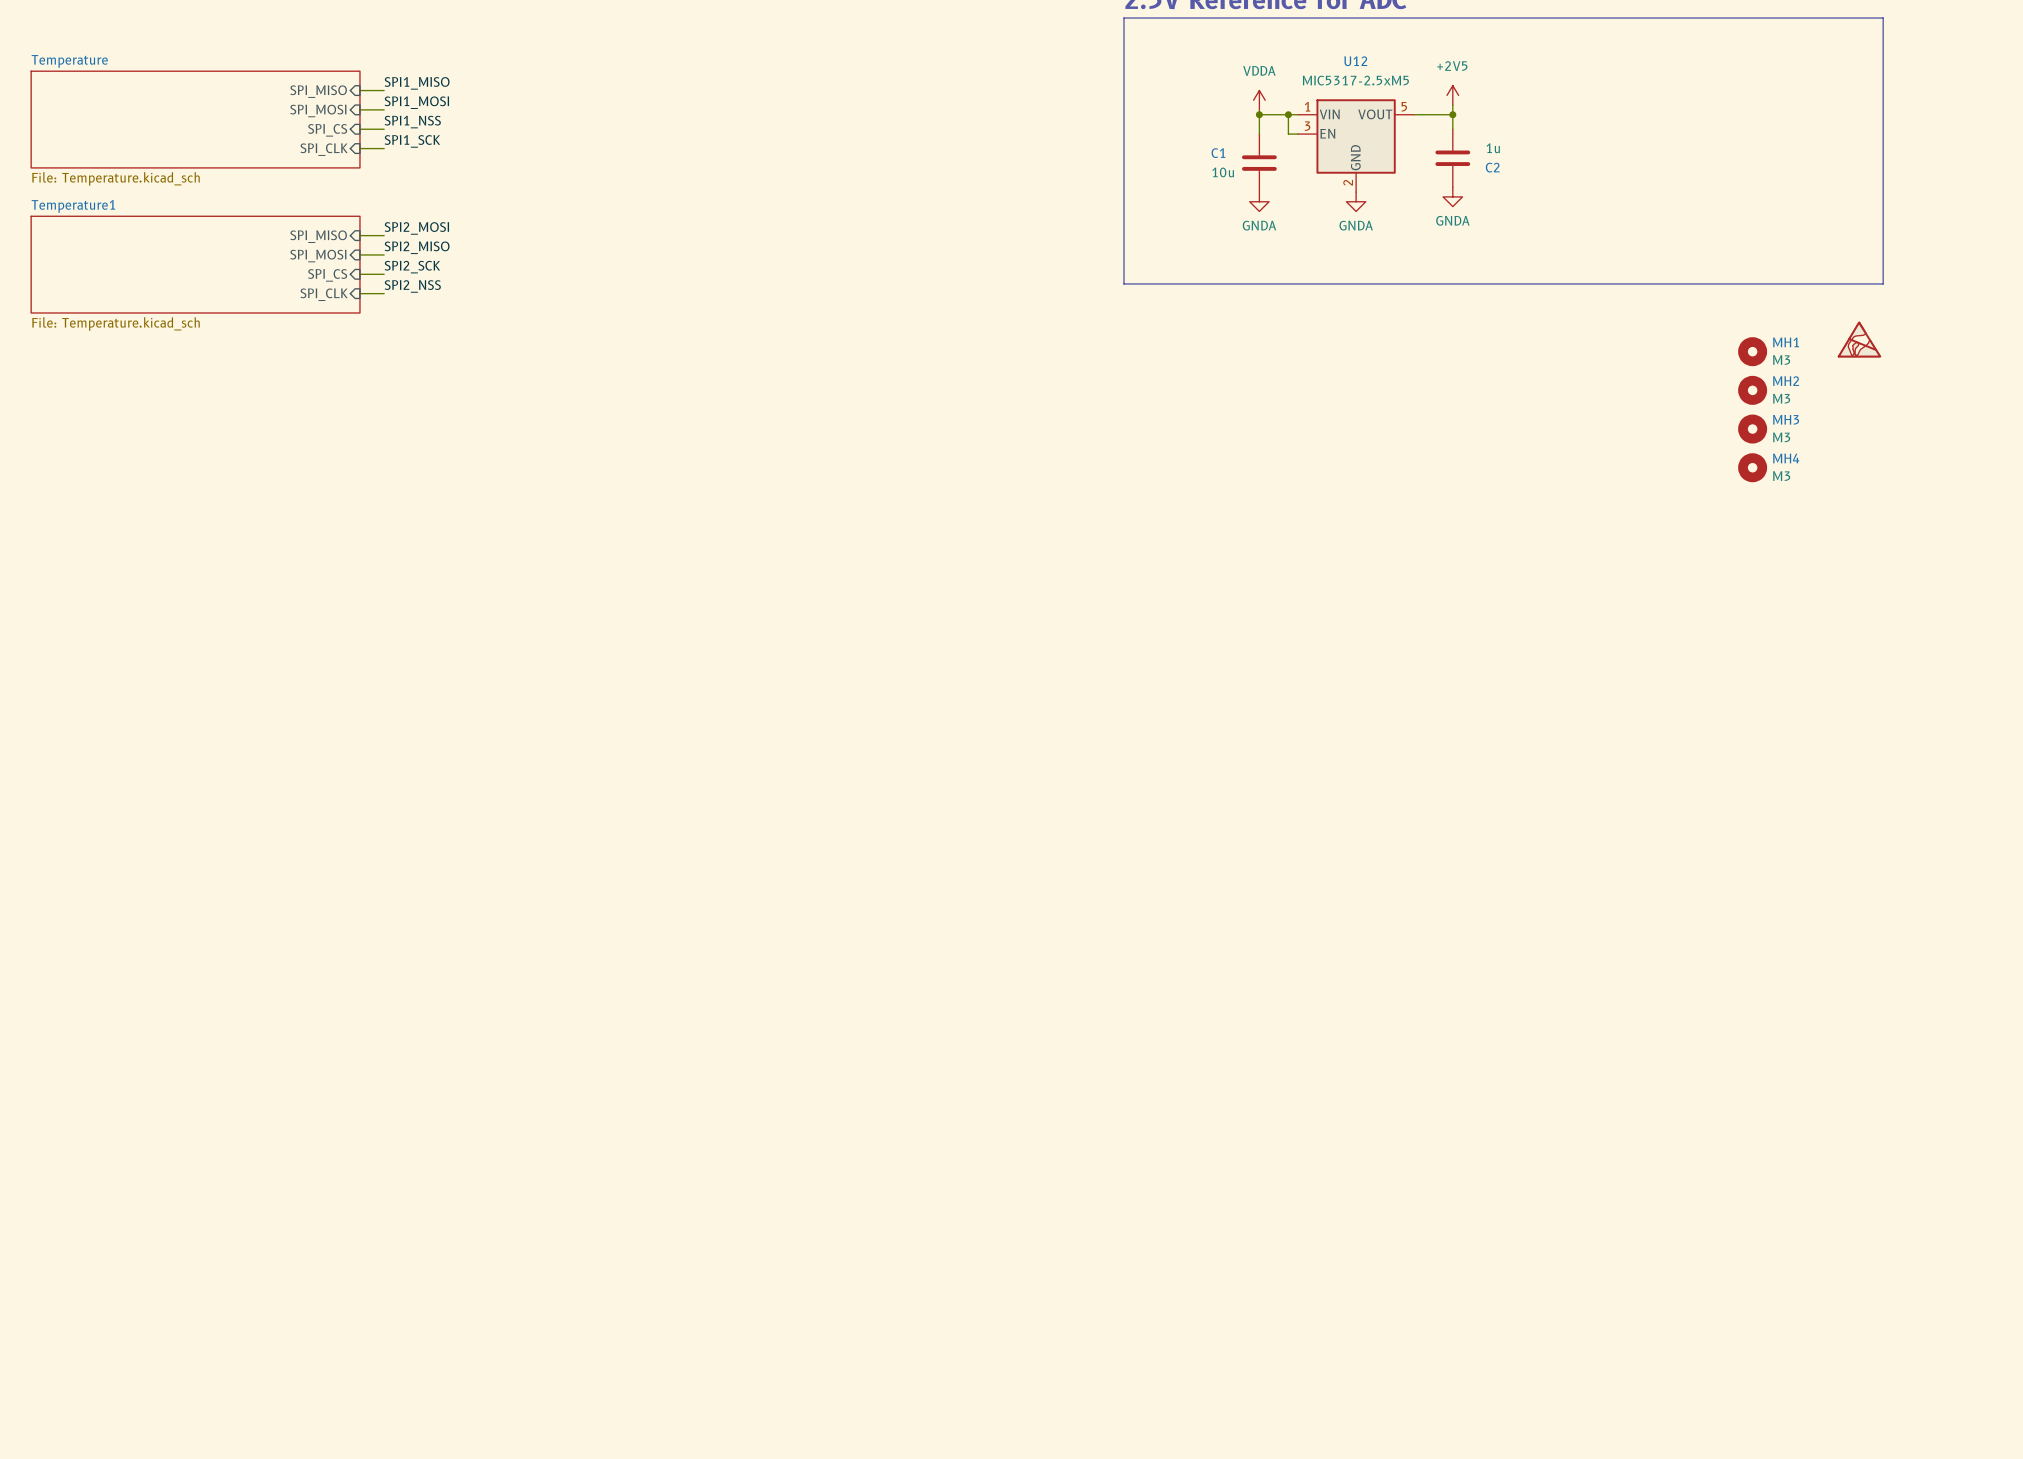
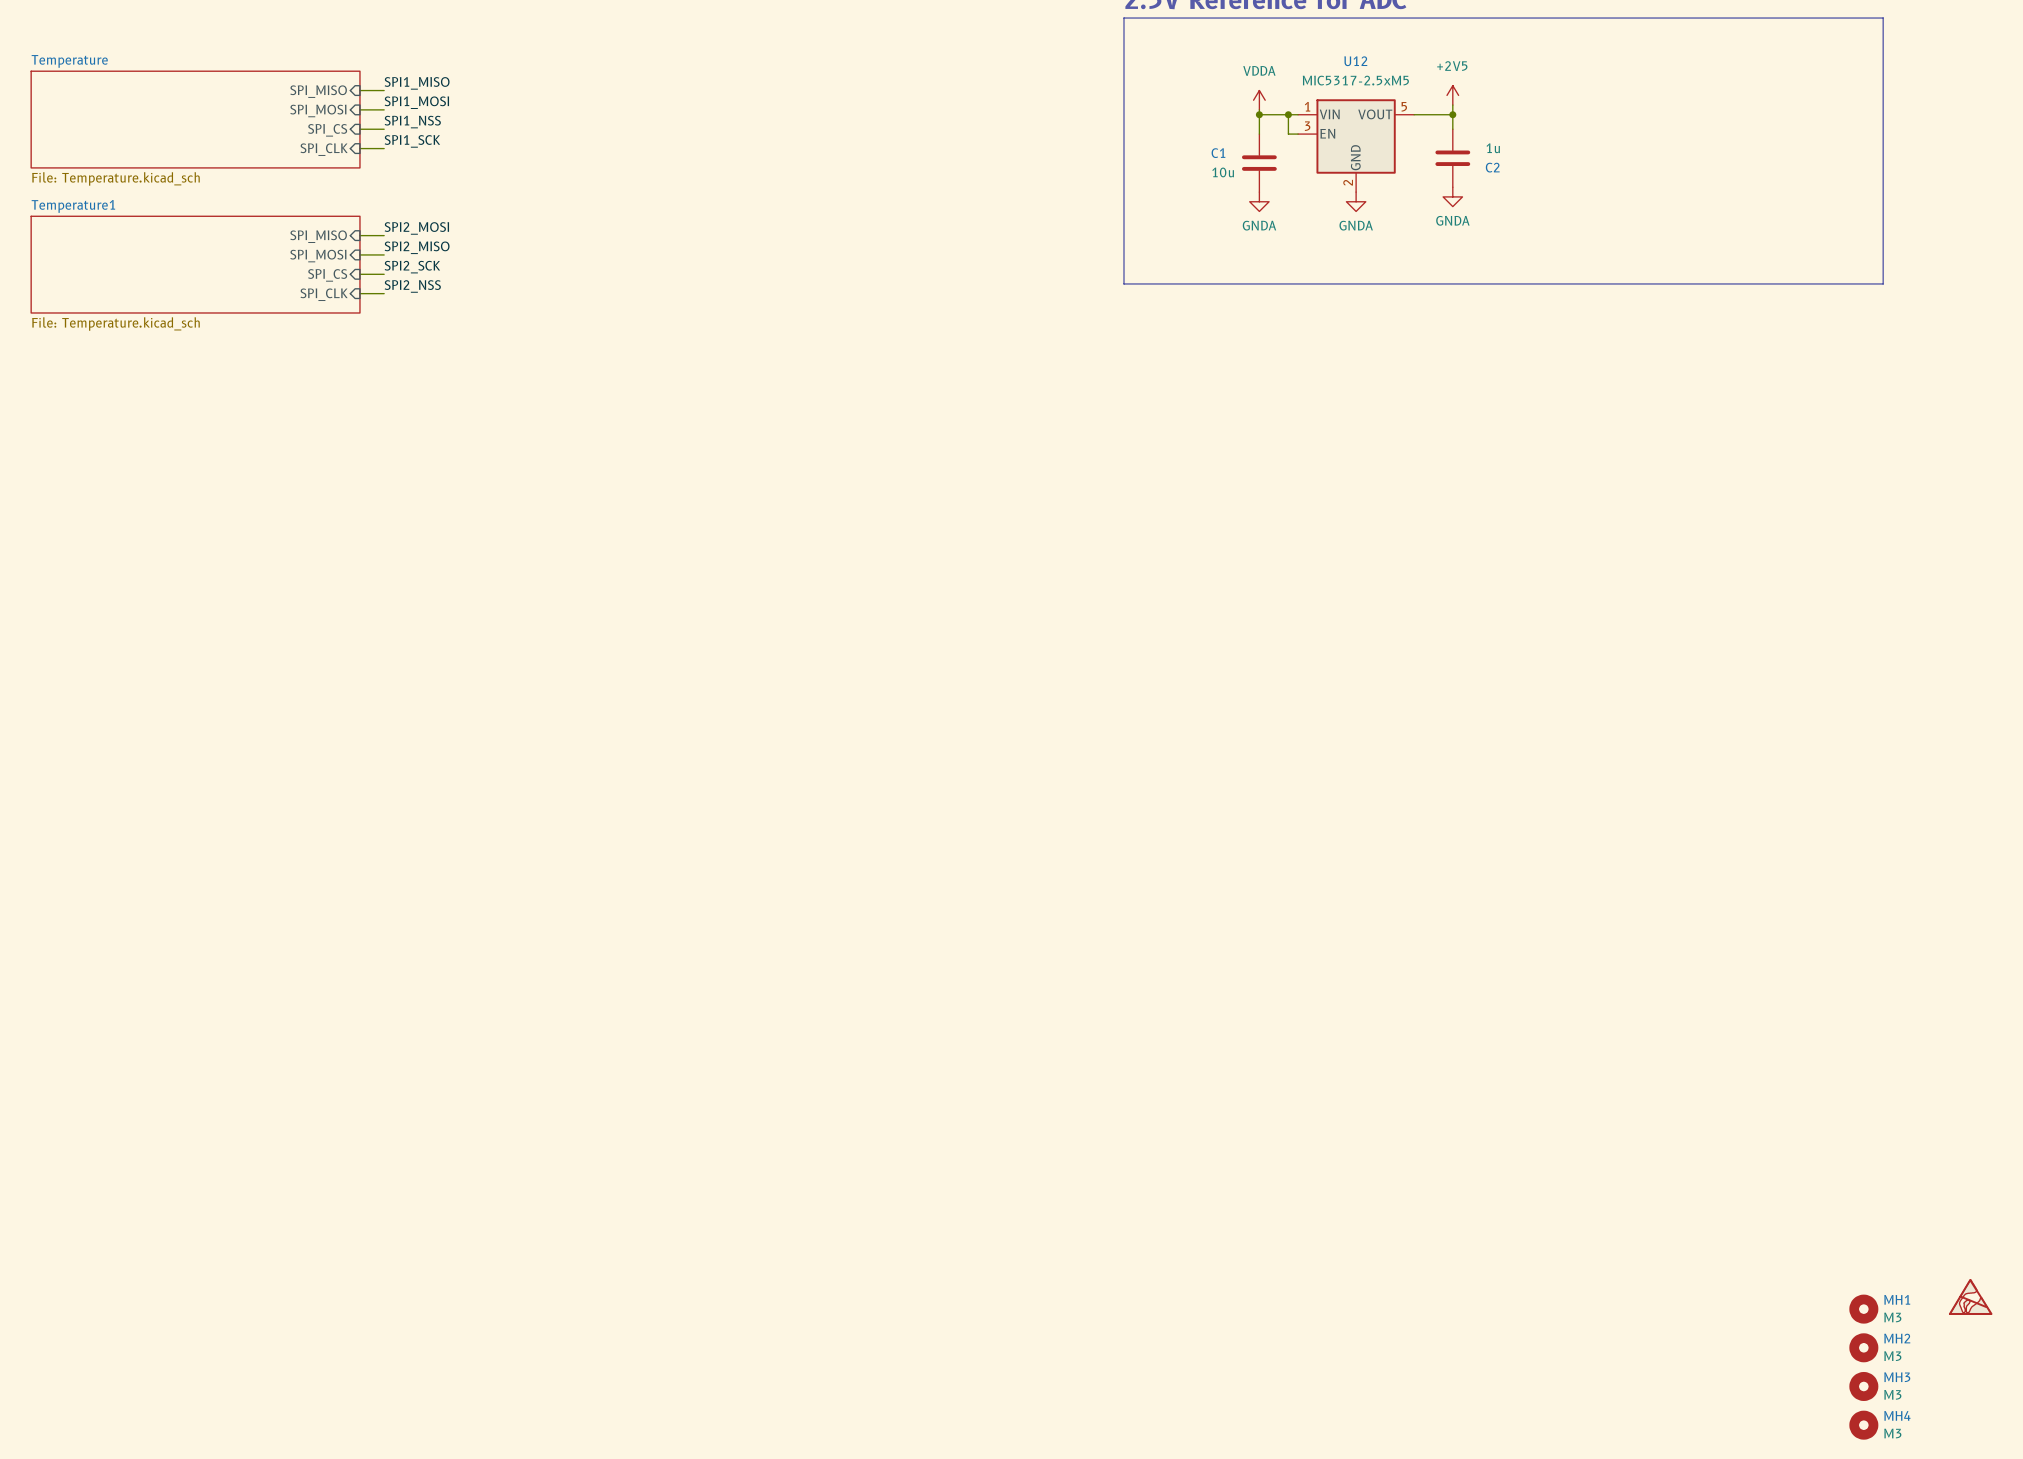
power symbol: (1859, 339) -> none
MH1 position: (1752, 351) -> (1863, 1309)
MH2 position: (1752, 390) -> (1863, 1347)
MH3 position: (1752, 429) -> (1863, 1386)
MH4 position: (1752, 467) -> (1863, 1425)
power symbol: none -> (1970, 1297)

